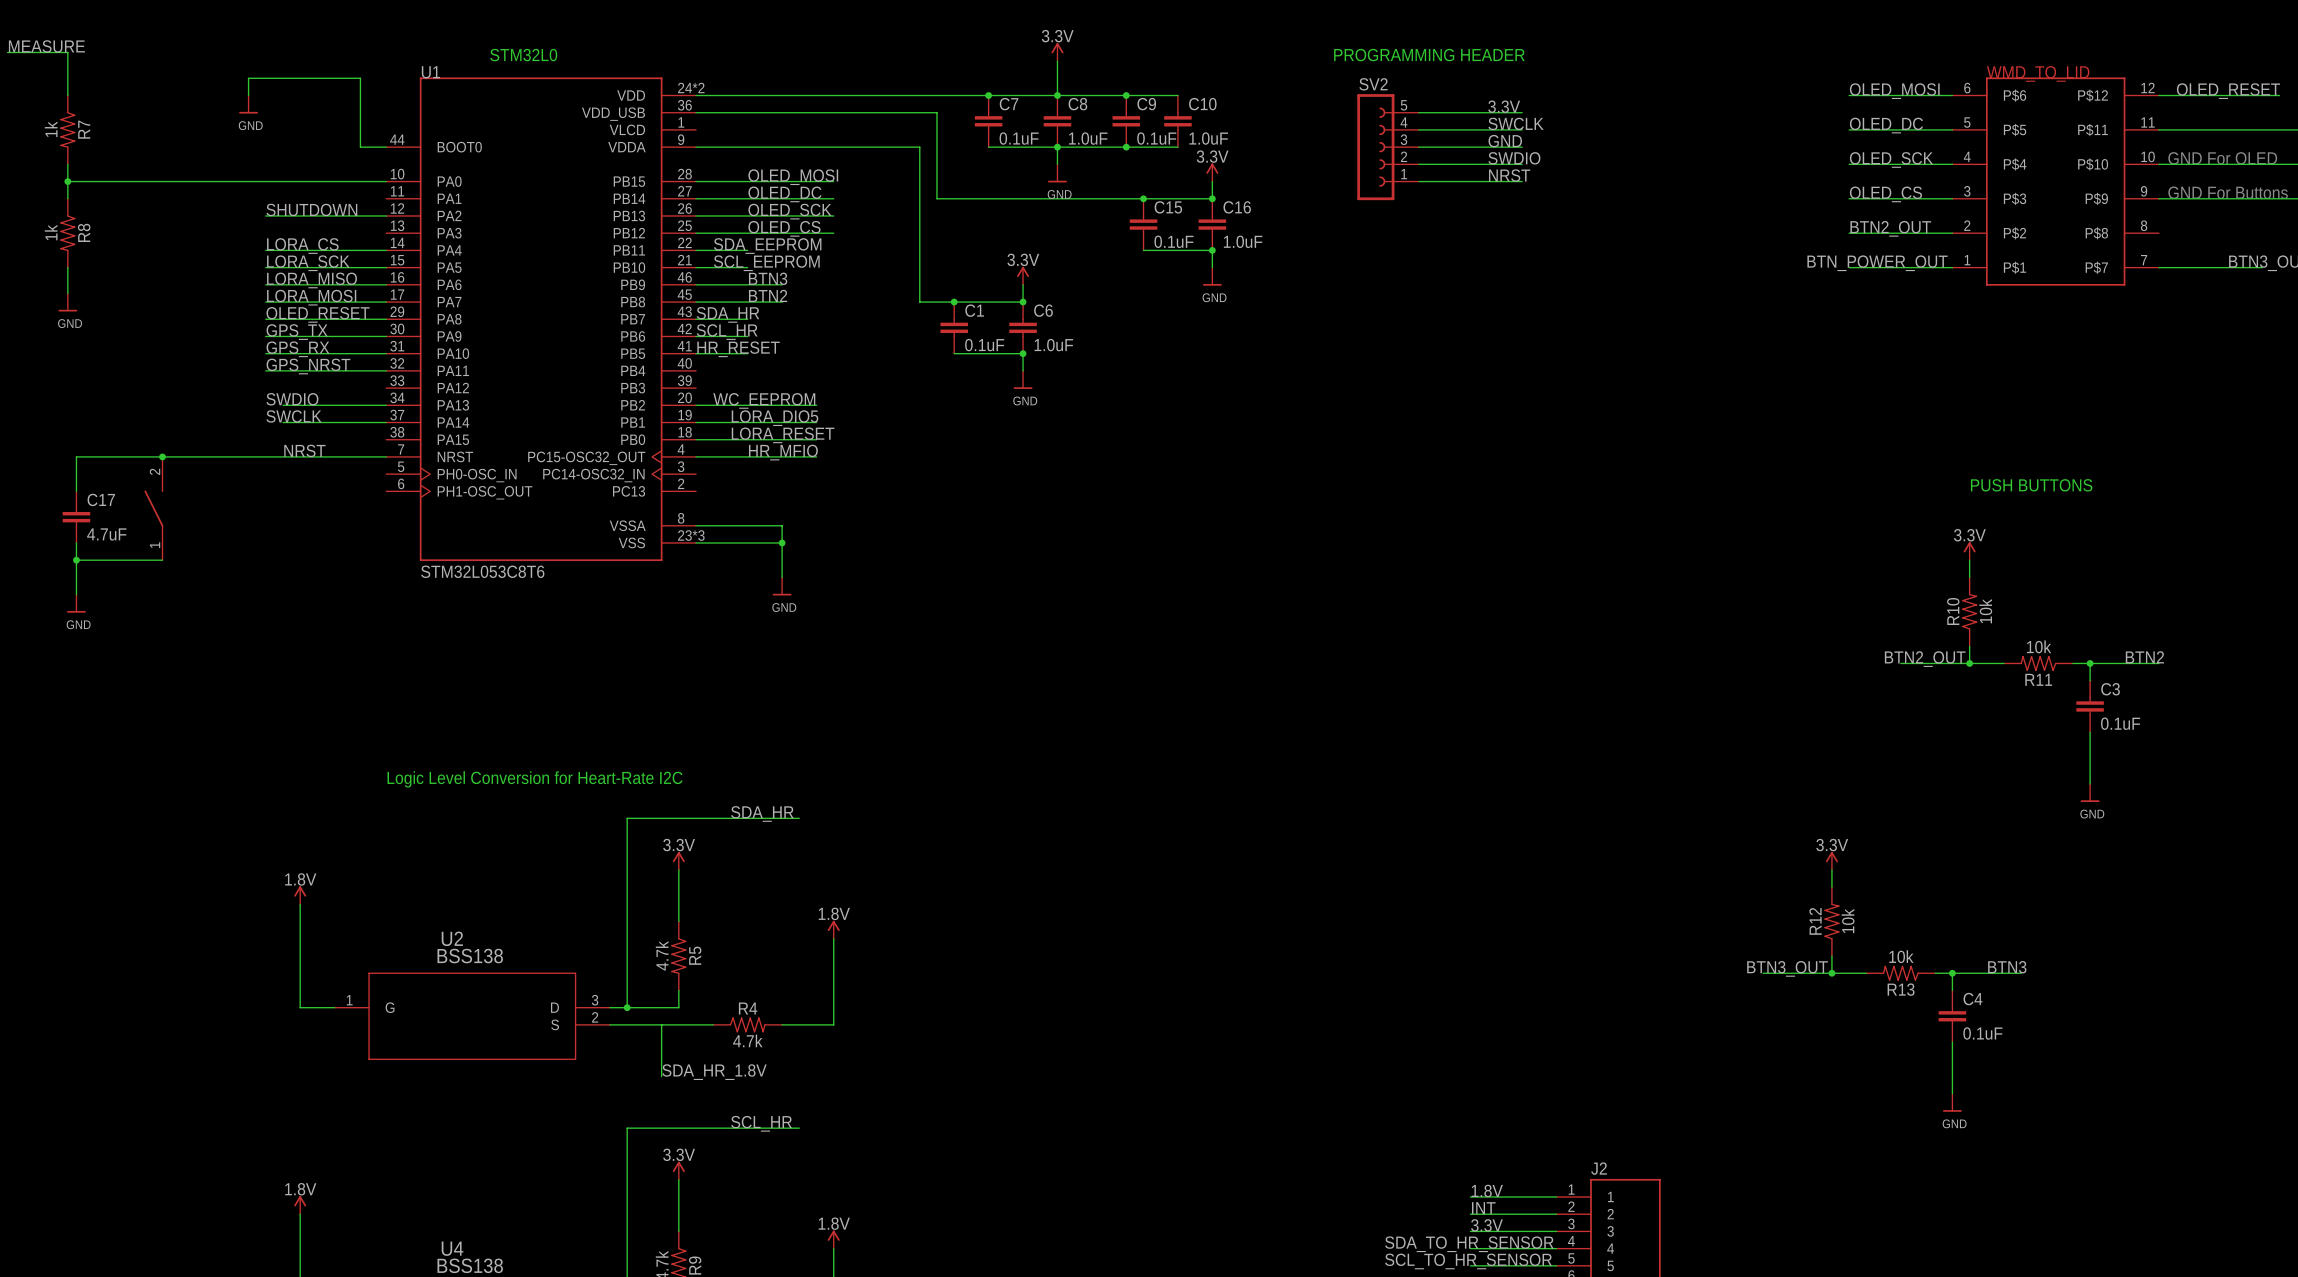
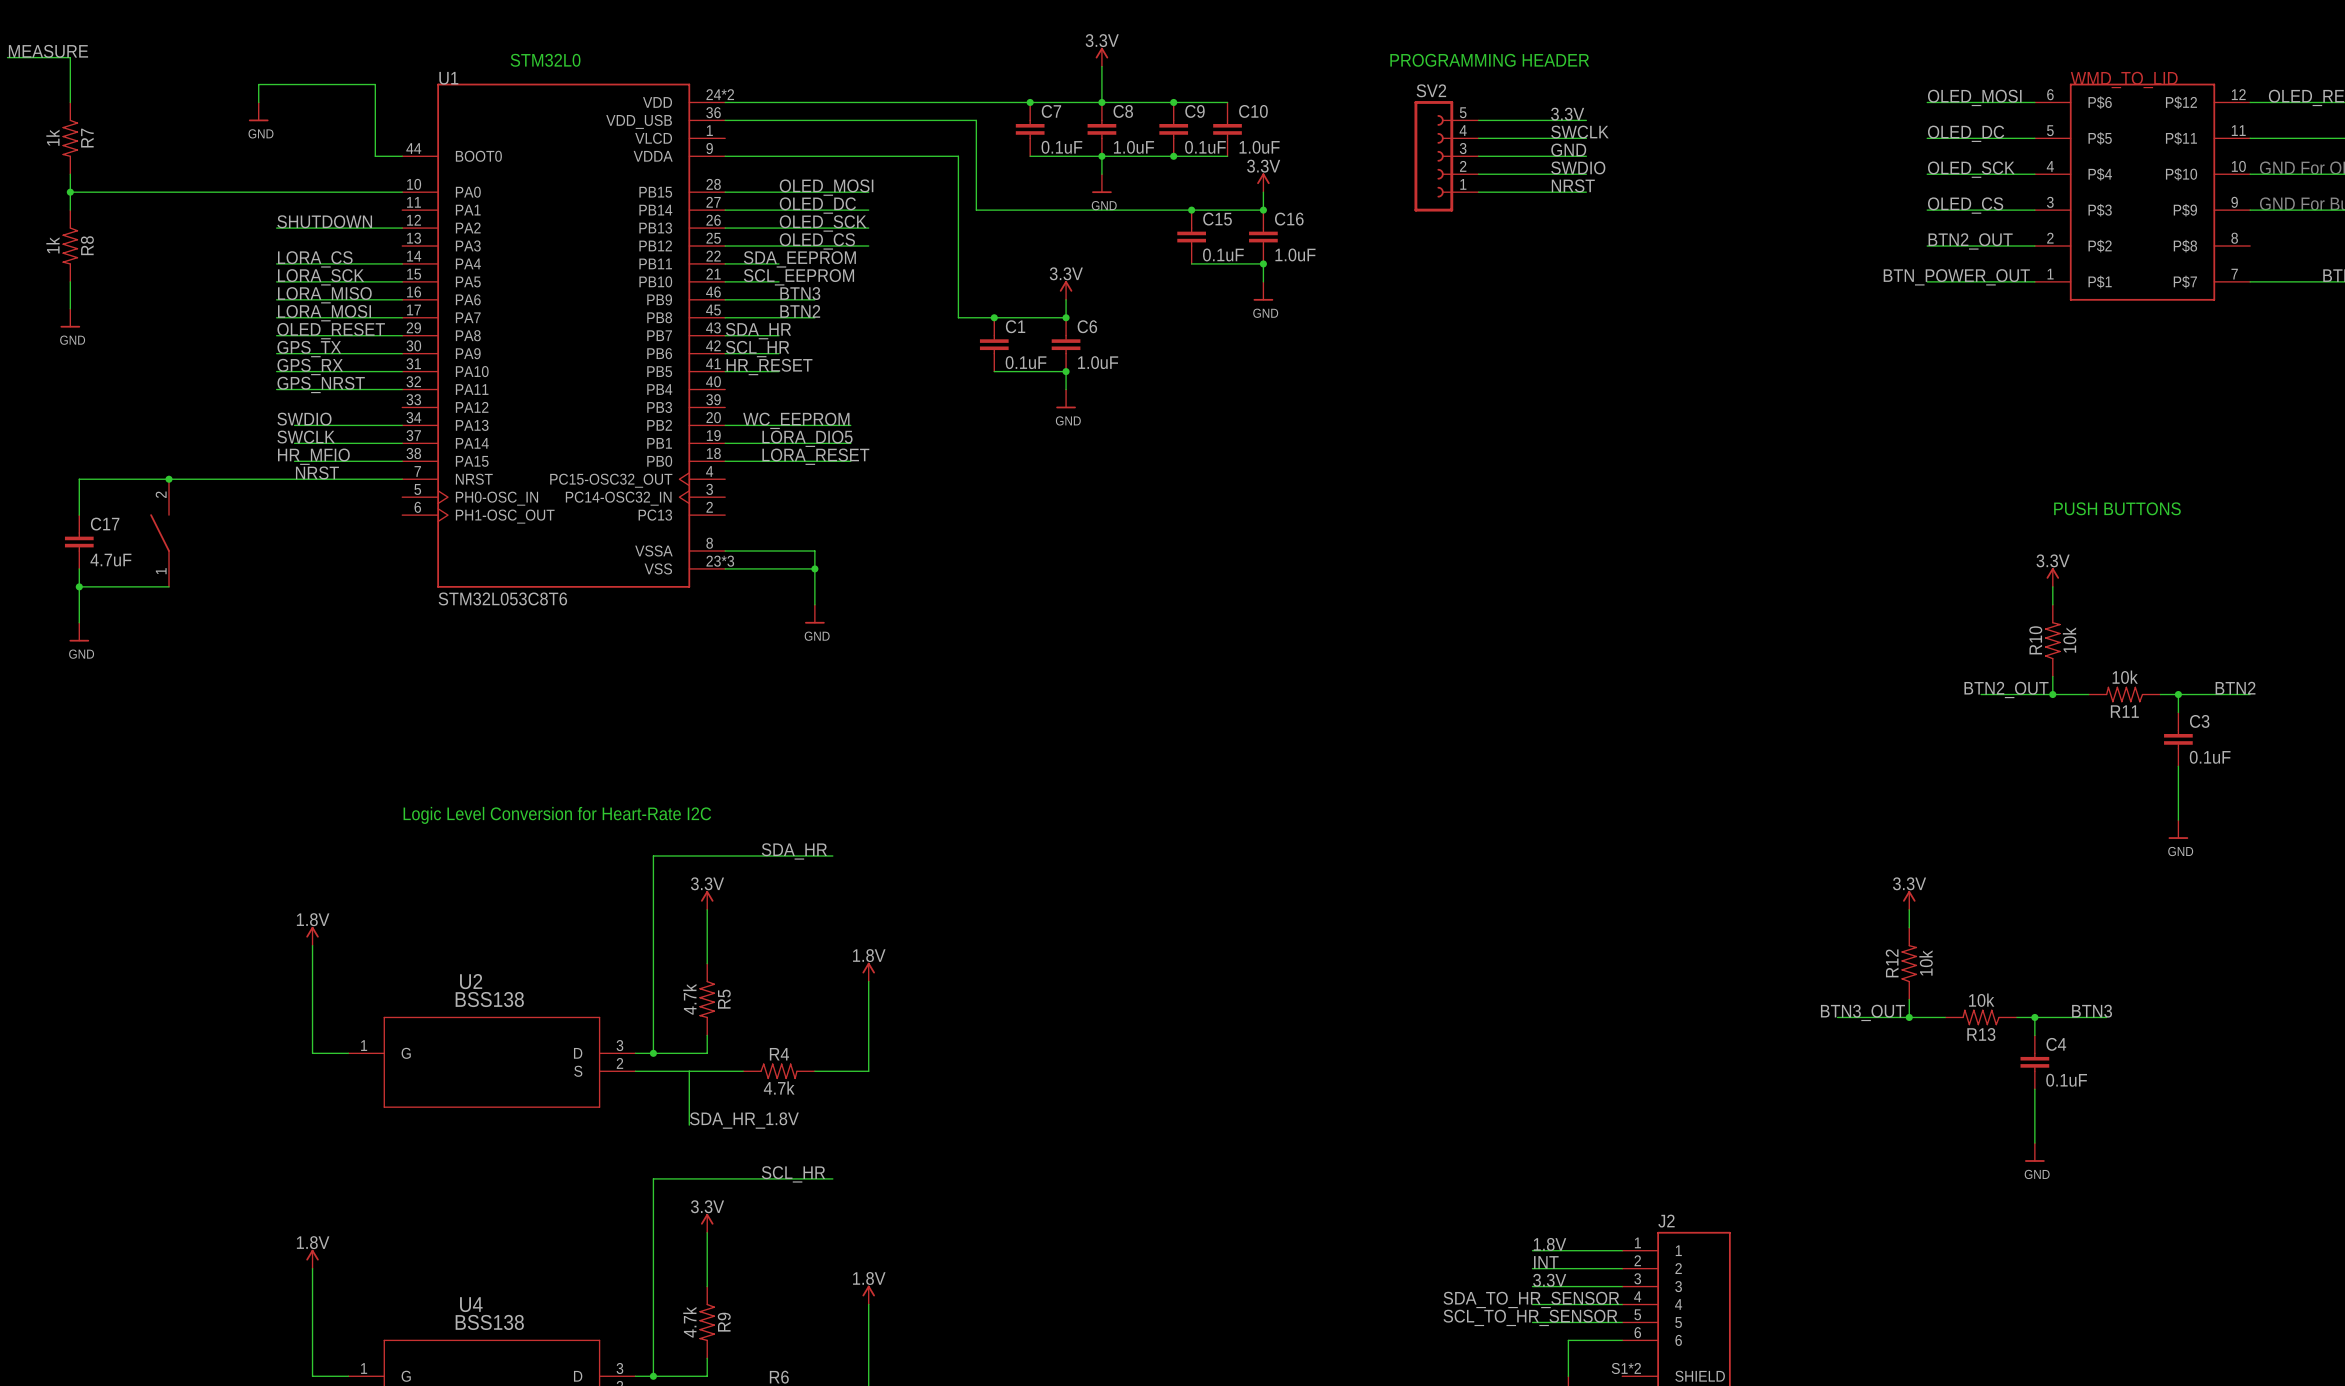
label: none -> HR_MFIO (313, 456)
wire: none -> (294, 461) (402, 461)
label: HR_MFIO (783, 452) -> none
wire: (696, 456) (816, 456) -> none

